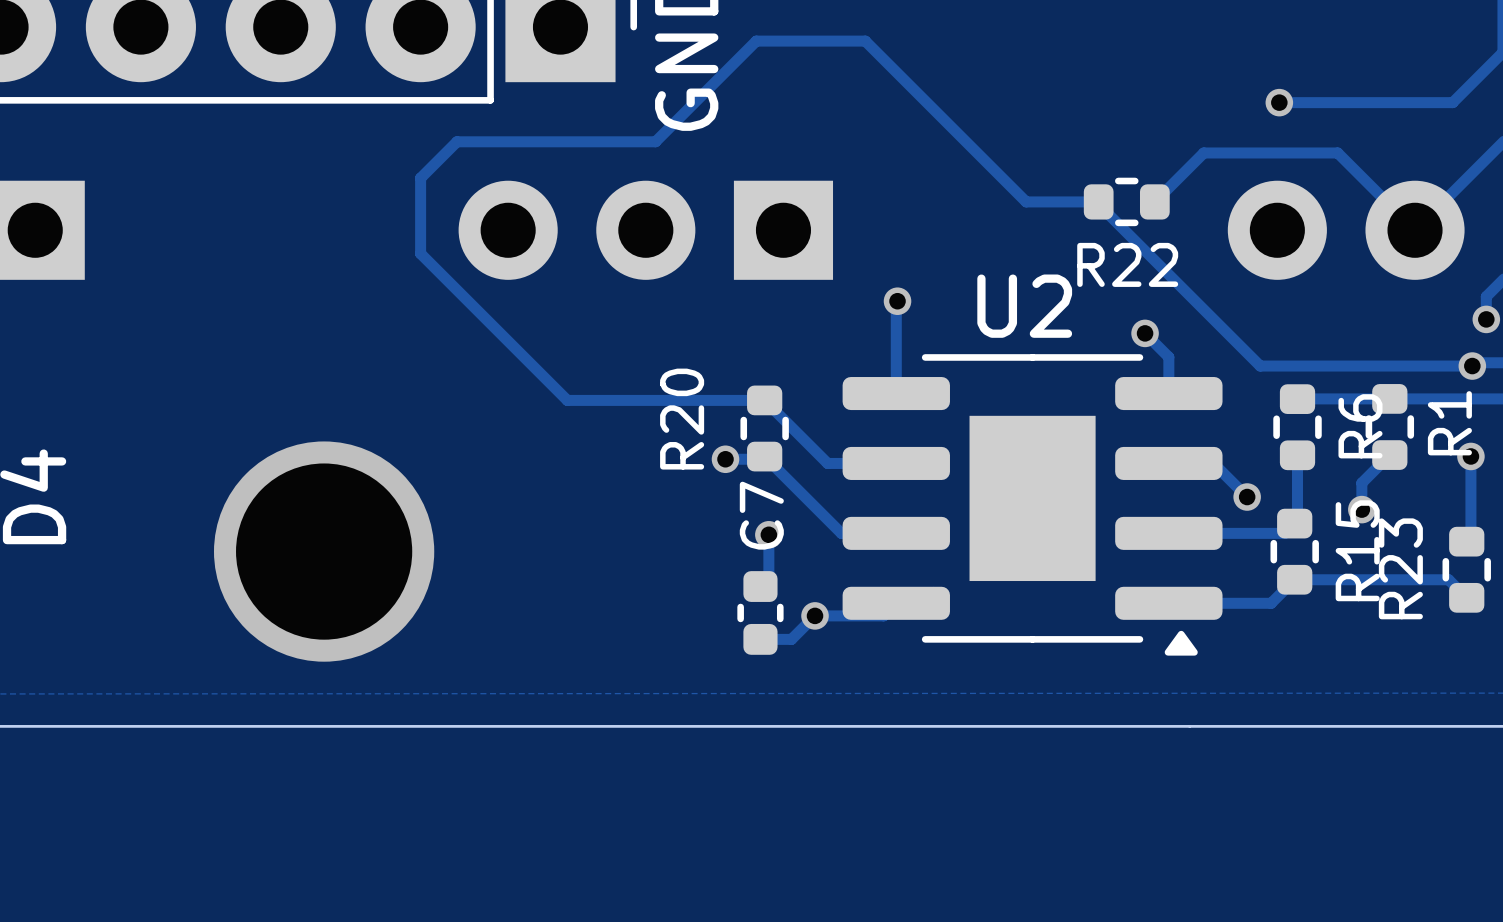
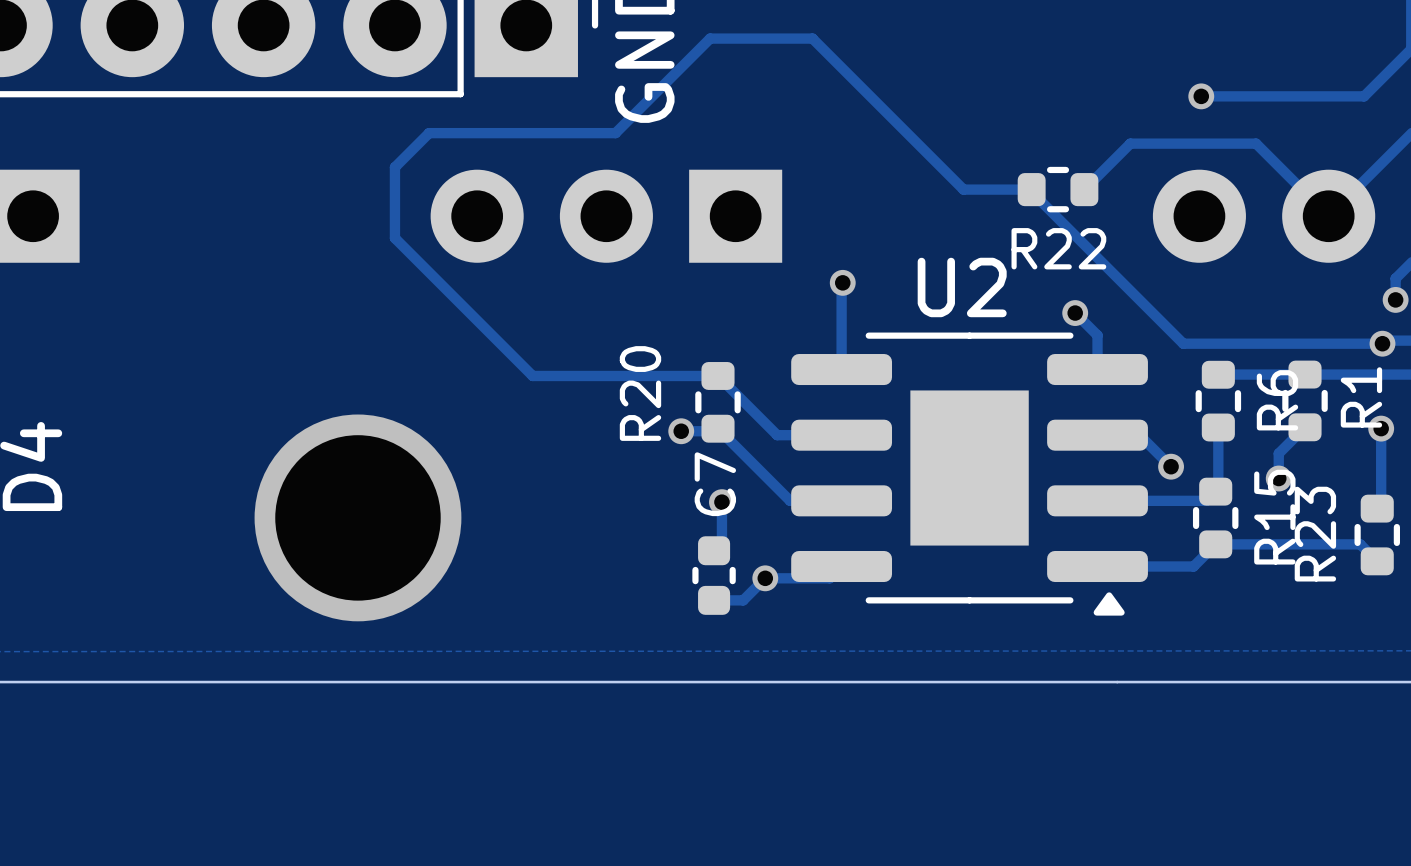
via position: (324, 551) -> (357, 517)

